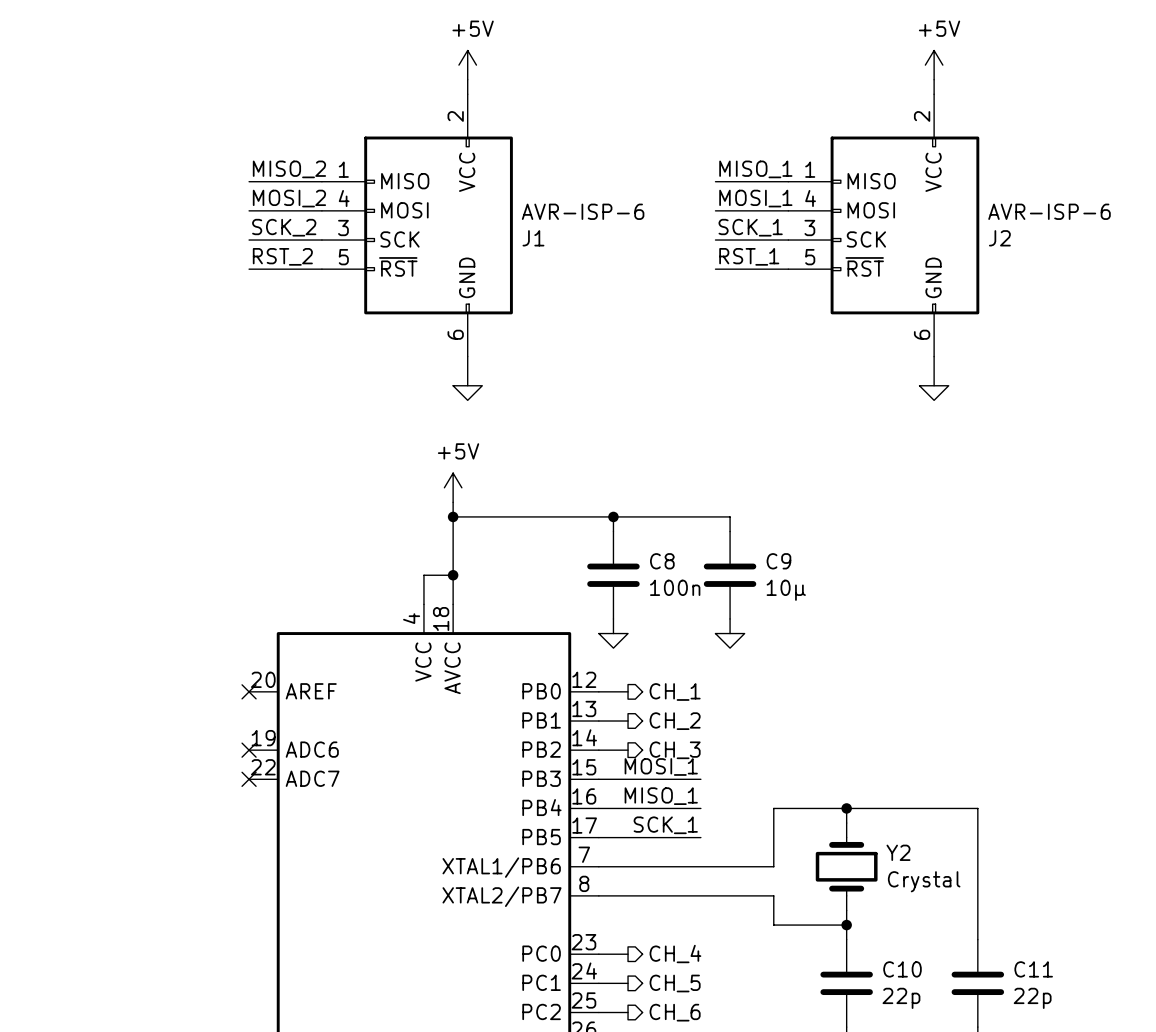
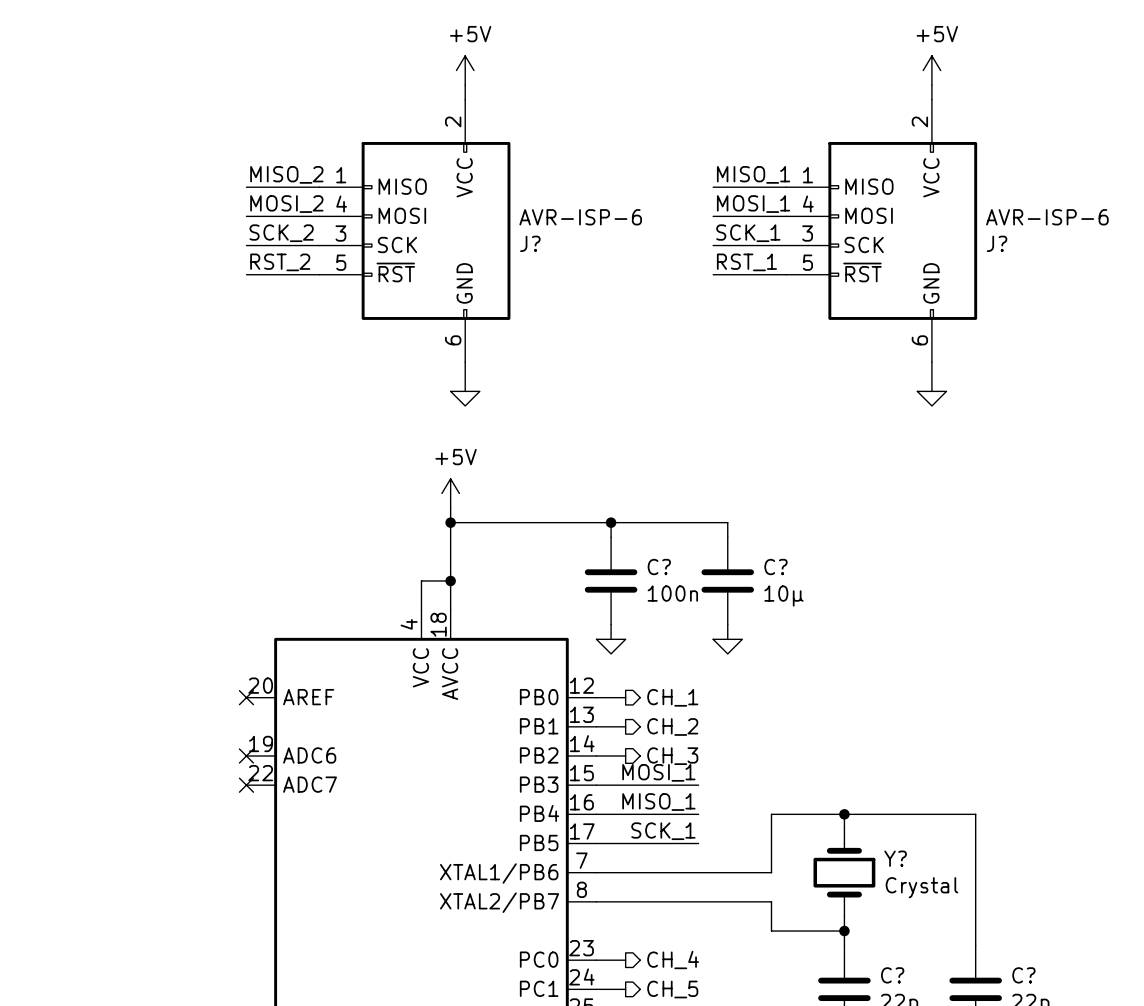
J1 name: J1 (533, 238) -> J? (530, 243)
J2 name: J2 (999, 238) -> J? (997, 243)
C8 name: C8 (662, 561) -> C? (659, 567)
C9 name: C9 (778, 561) -> C? (775, 567)
Y2 name: Y2 (898, 852) -> Y? (895, 858)
C10 name: C10 (902, 969) -> C? (892, 975)
C11 name: C11 (1033, 969) -> C? (1023, 975)

